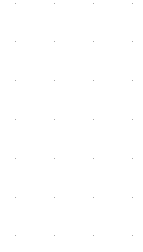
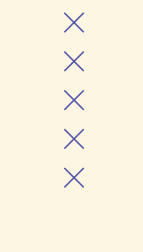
no-connect mark: none -> (74, 22)
no-connect mark: none -> (74, 61)
no-connect mark: none -> (74, 100)
no-connect mark: none -> (74, 138)
no-connect mark: none -> (74, 177)

